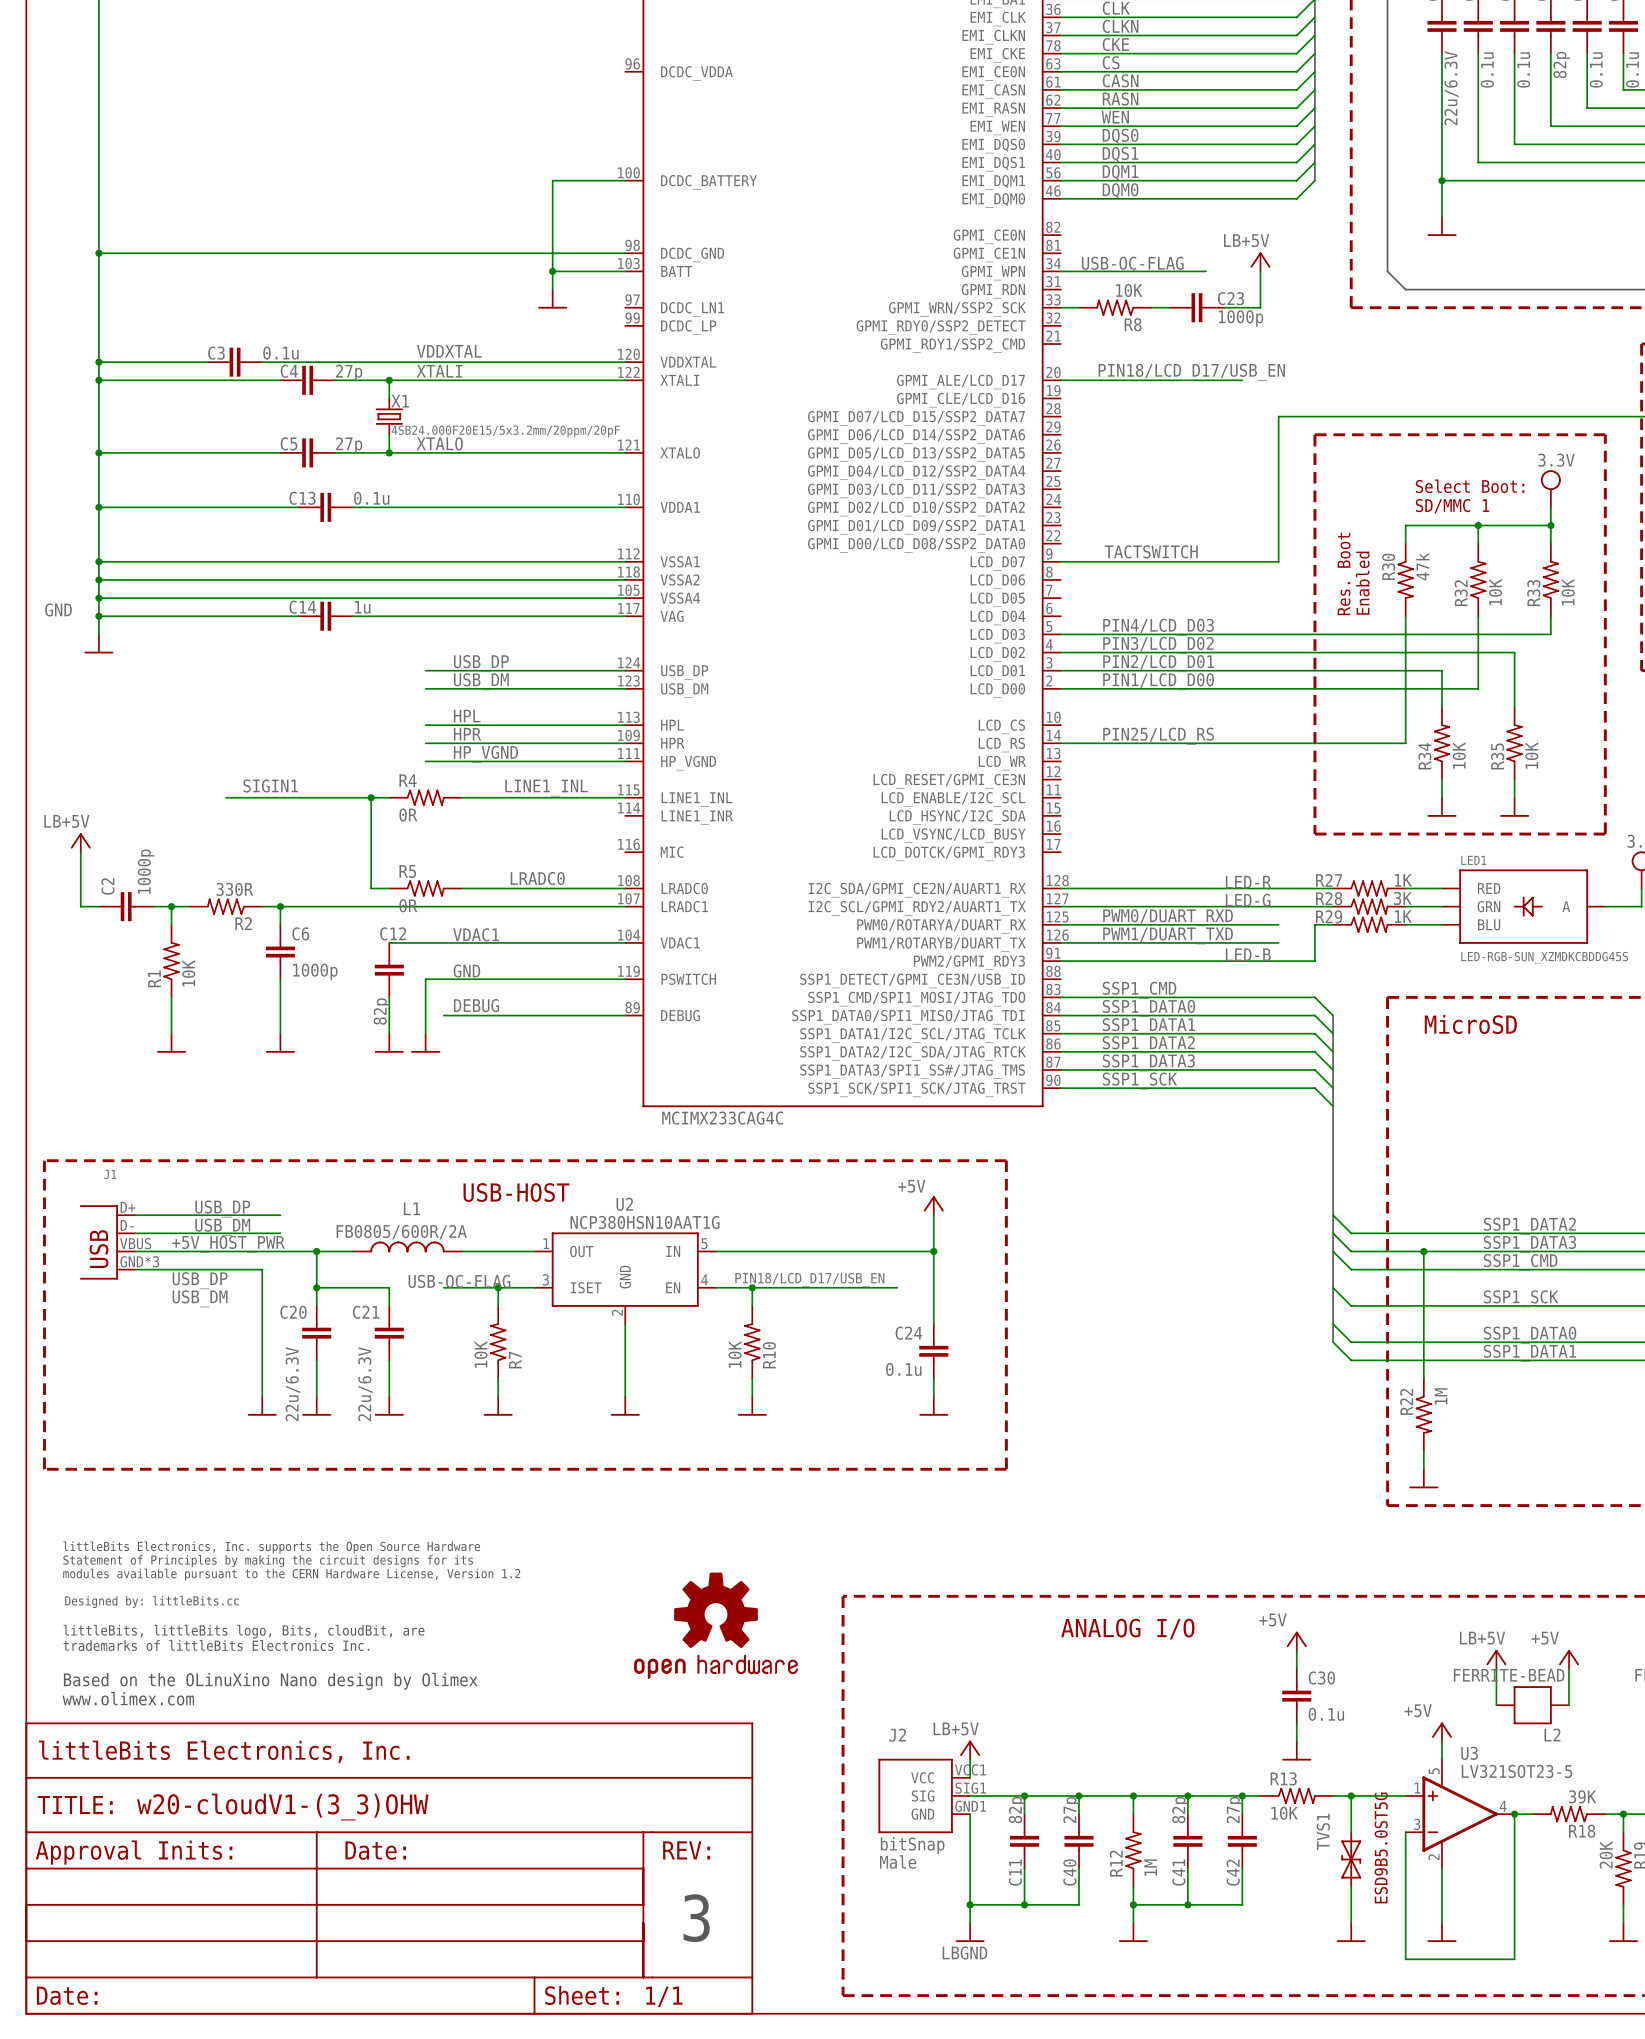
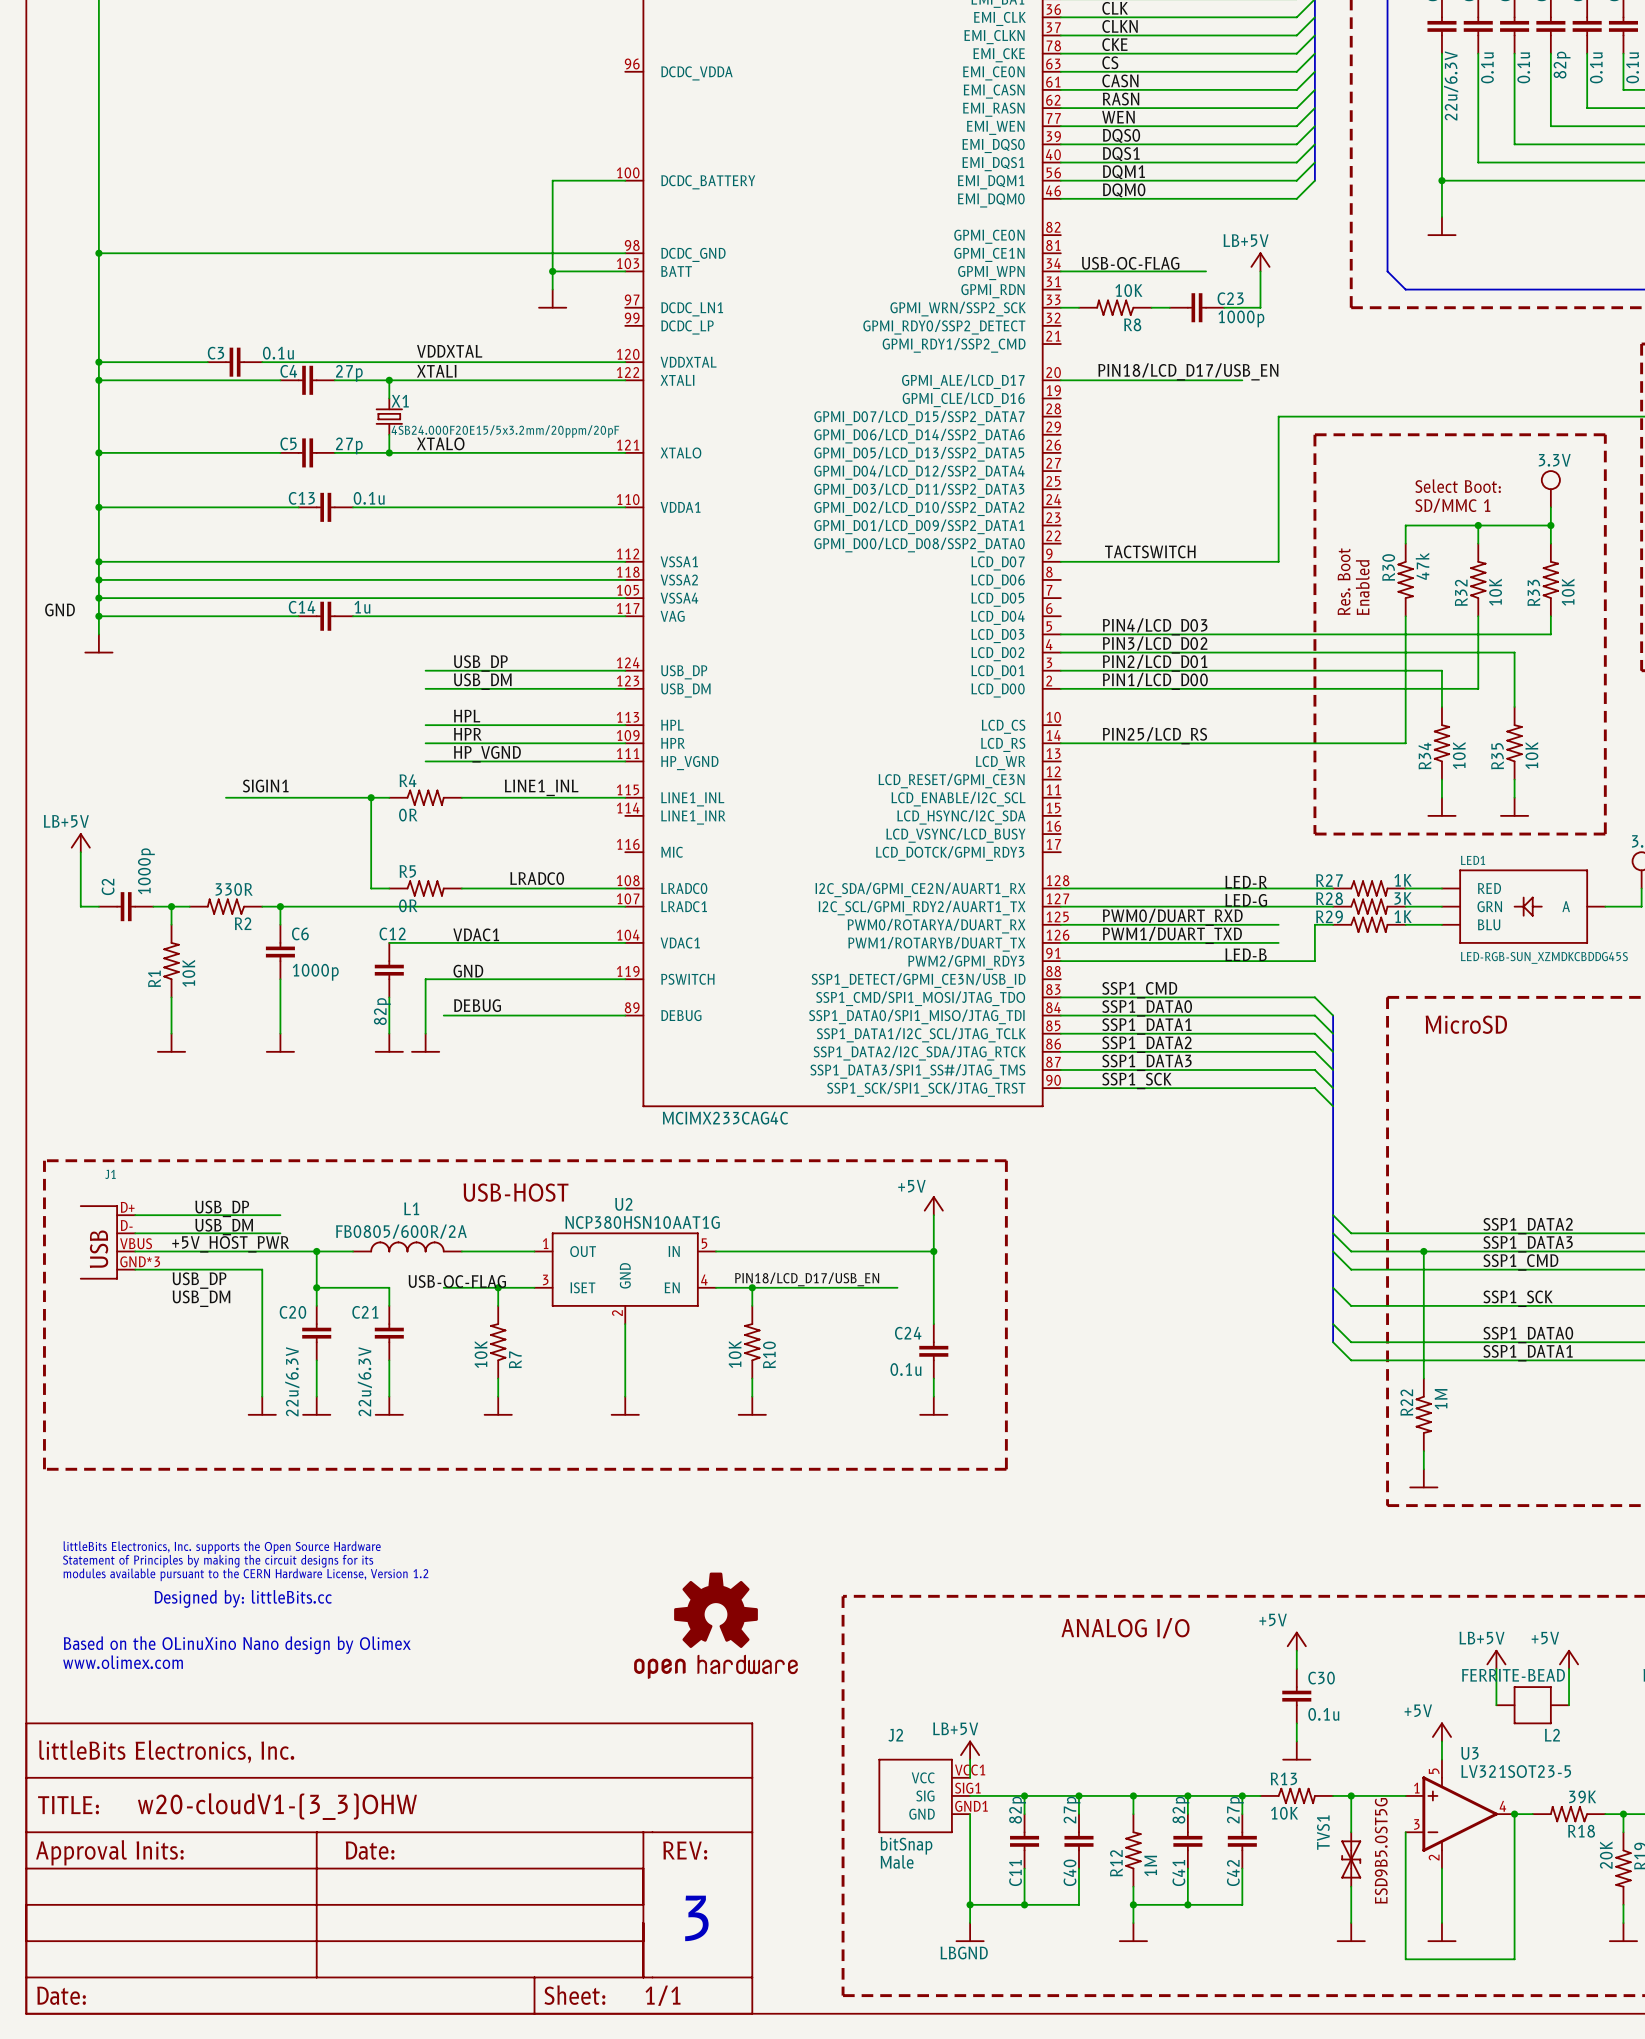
part: none -> (245, 1574)
part: (291, 1596) -> none
text position: Based on the OLinuXino Nano design by Olimex (270, 1681) -> Based on the OLinuXino Nano design by Olimex (237, 1645)
text position: www.olimex.com (128, 1698) -> www.olimex.com (123, 1662)

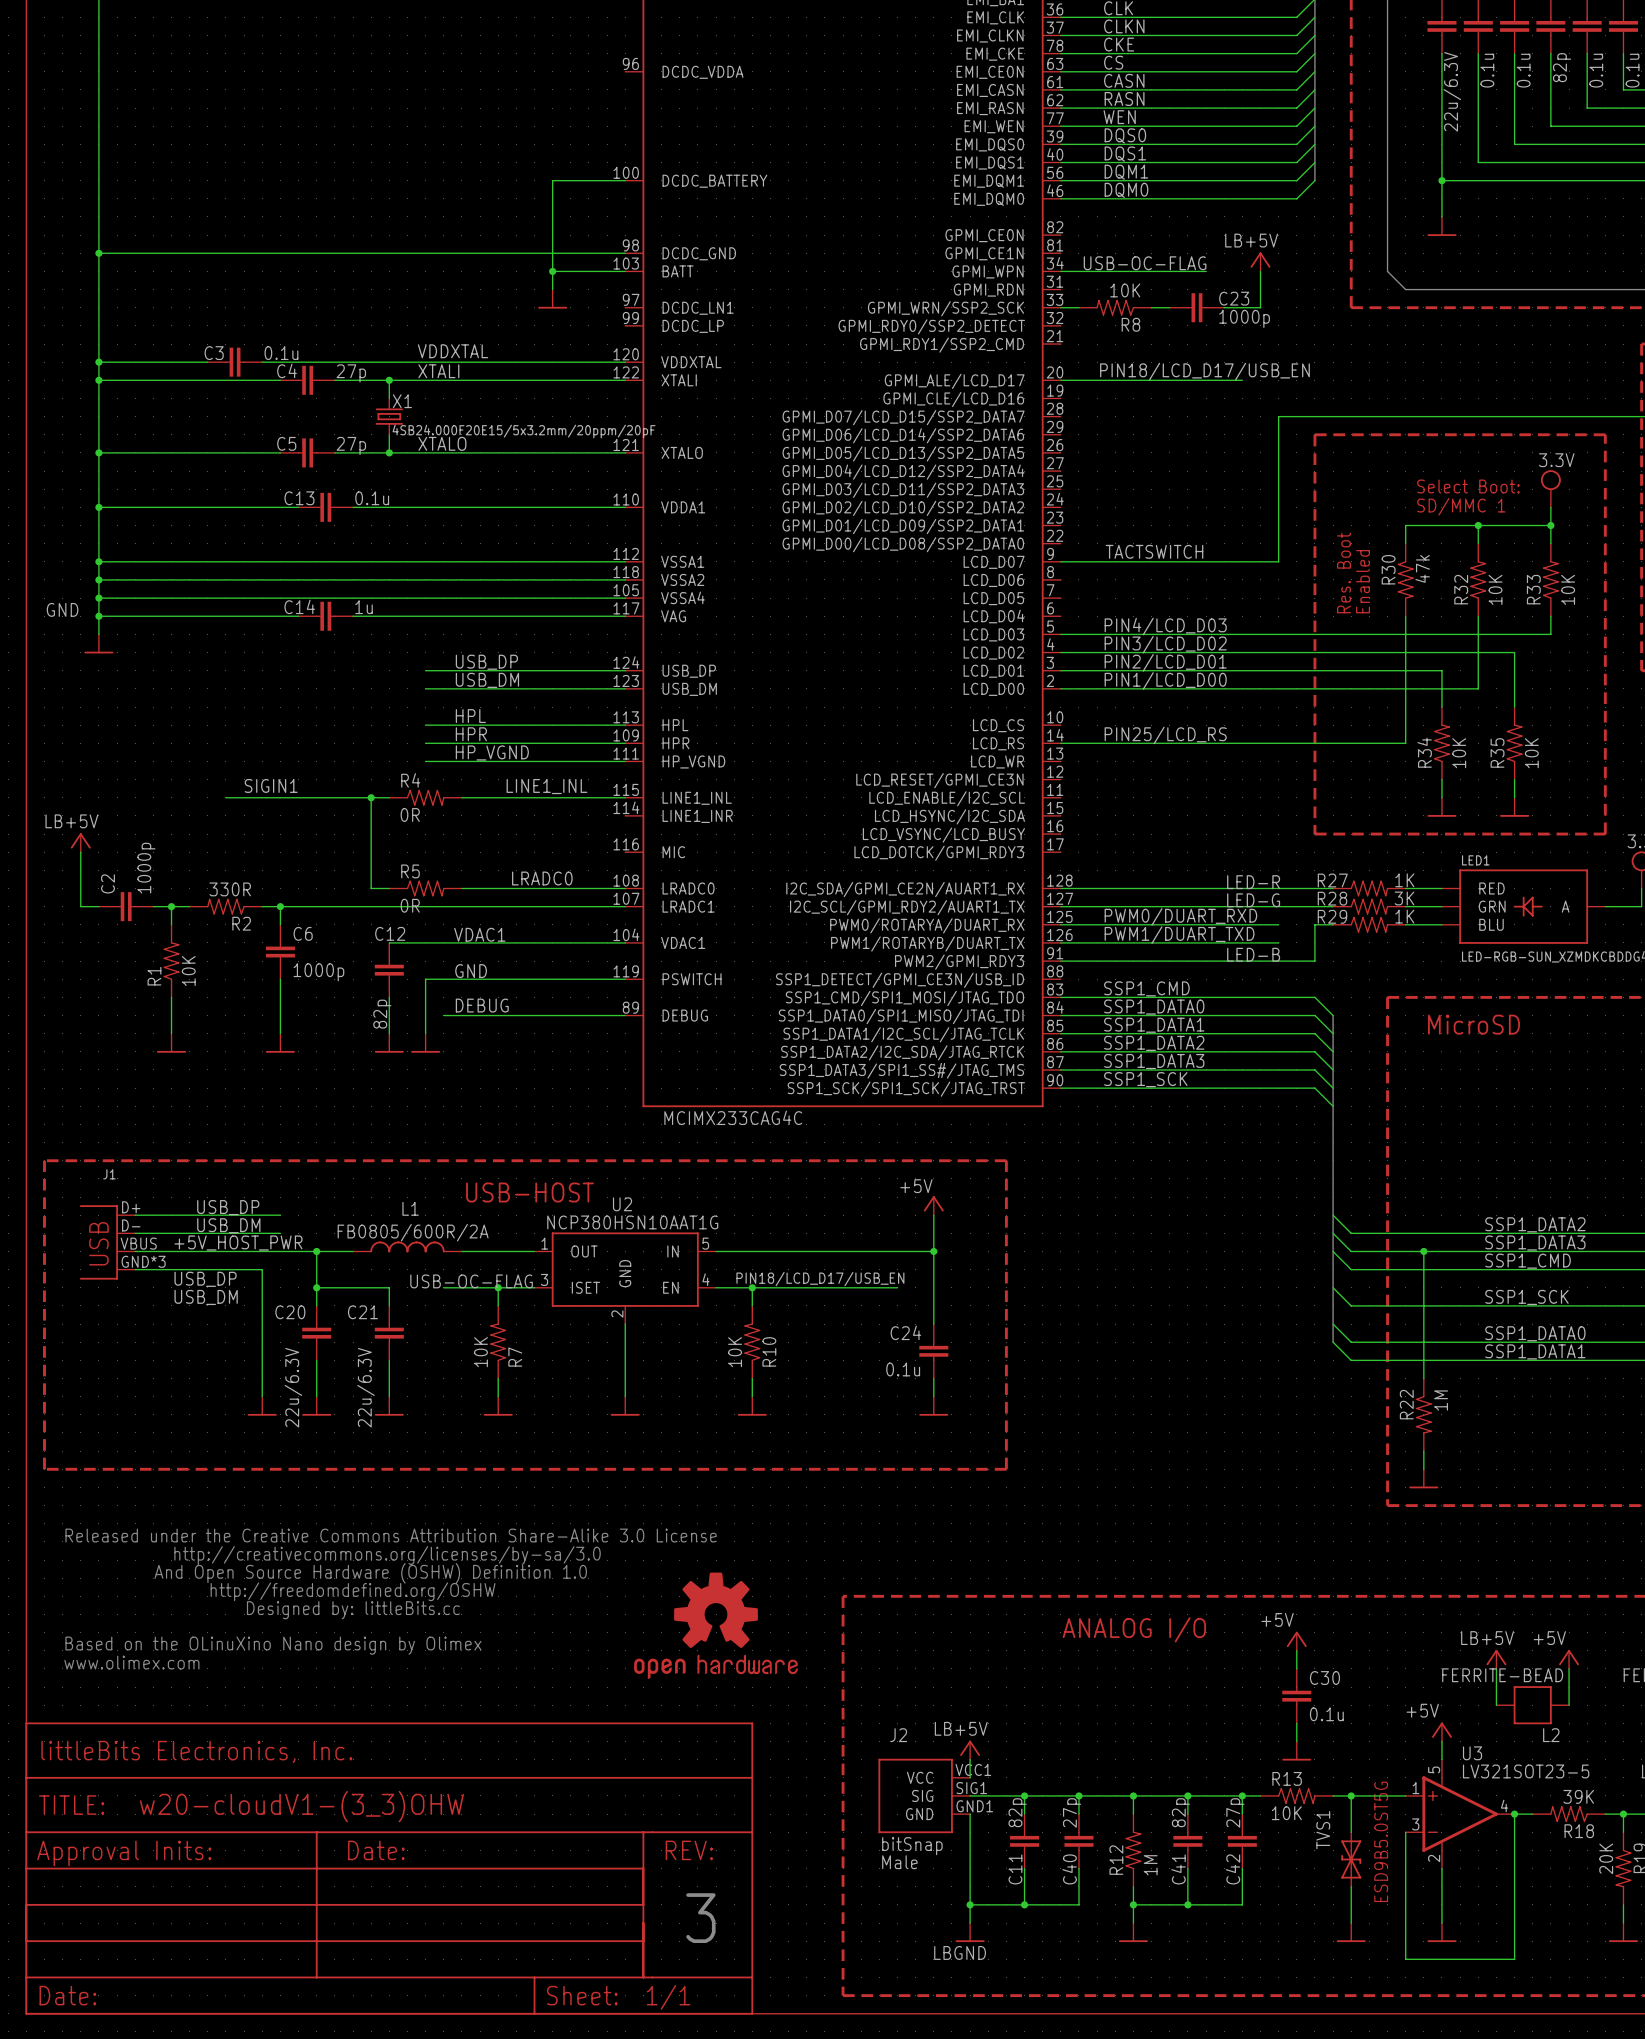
part: none -> (391, 1573)
part: (245, 1574) -> none

